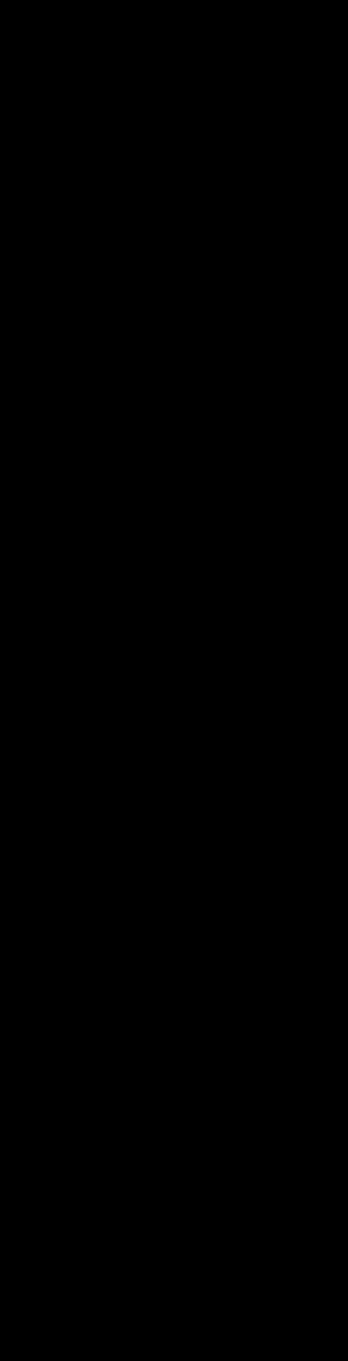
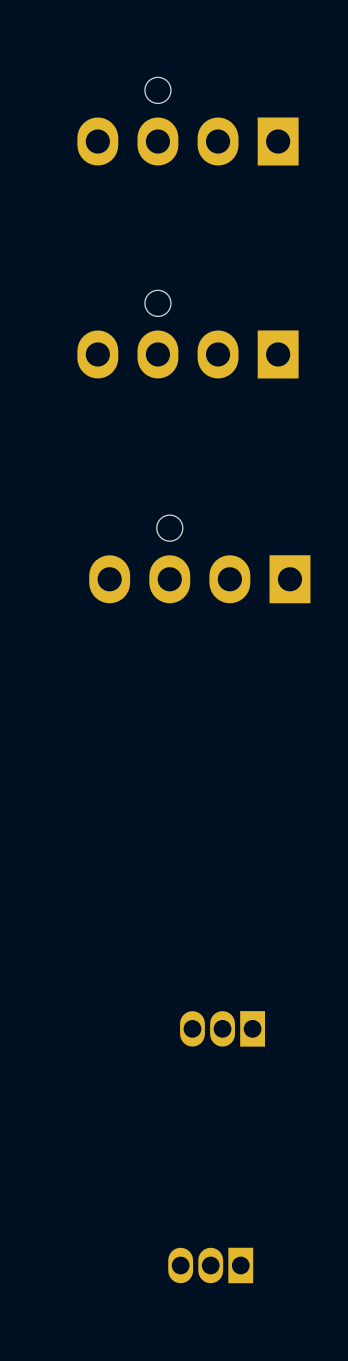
part: none -> (187, 121)
part: none -> (187, 334)
part: none -> (199, 559)
part: none -> (222, 1028)
part: none -> (210, 1265)

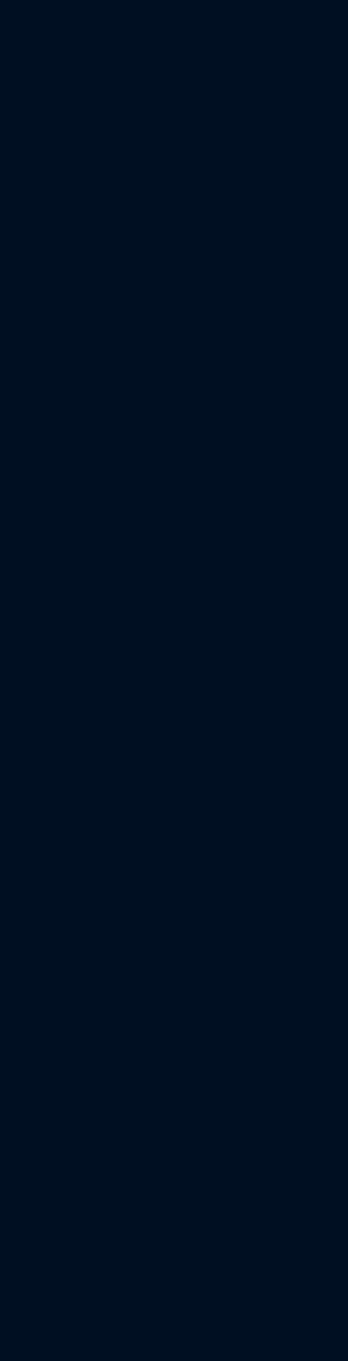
part: (187, 121) -> none
part: (187, 334) -> none
part: (199, 559) -> none
part: (222, 1028) -> none
part: (210, 1265) -> none

